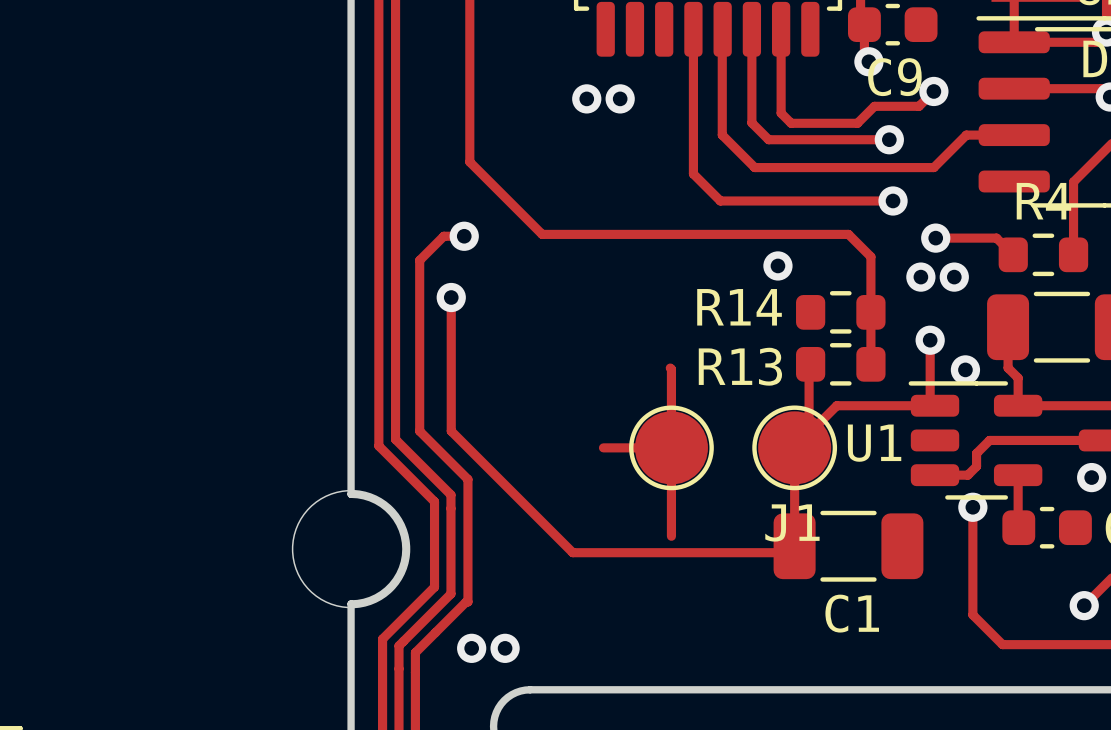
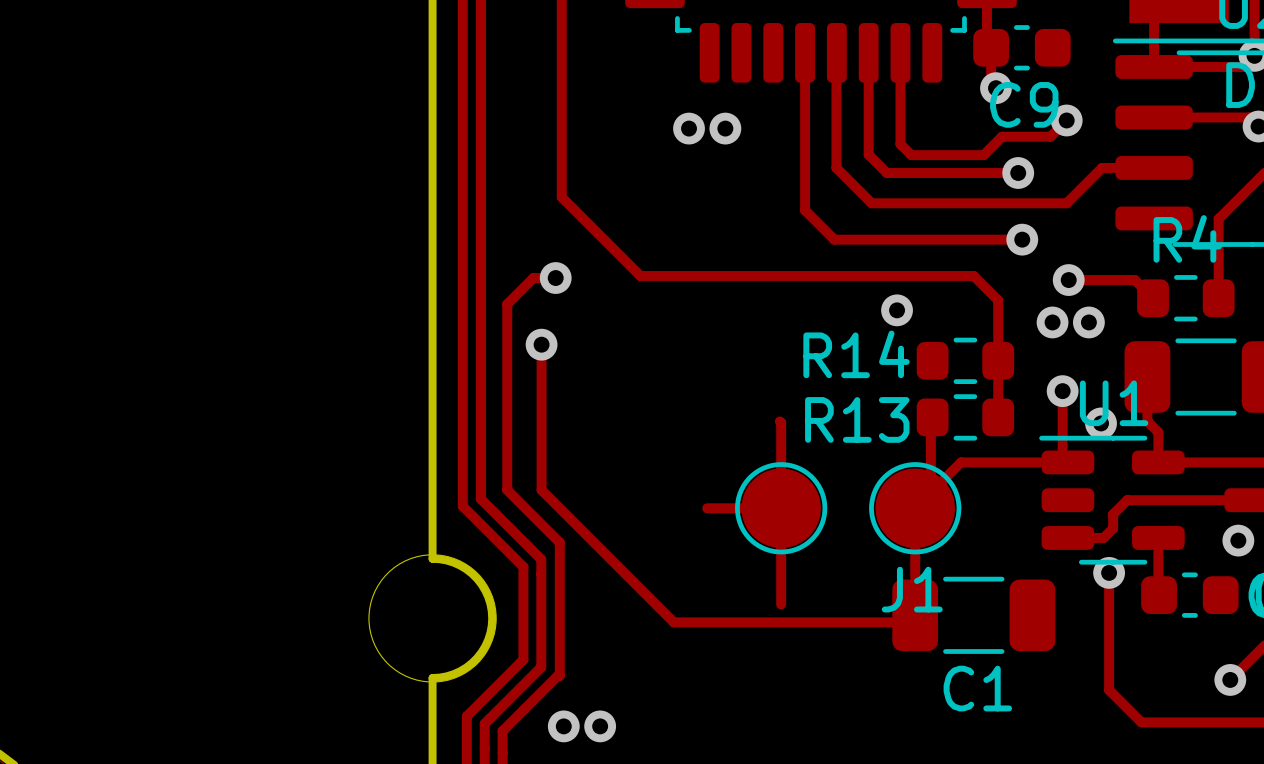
U1 name position: U1 (874, 443) -> U1 (1114, 403)

